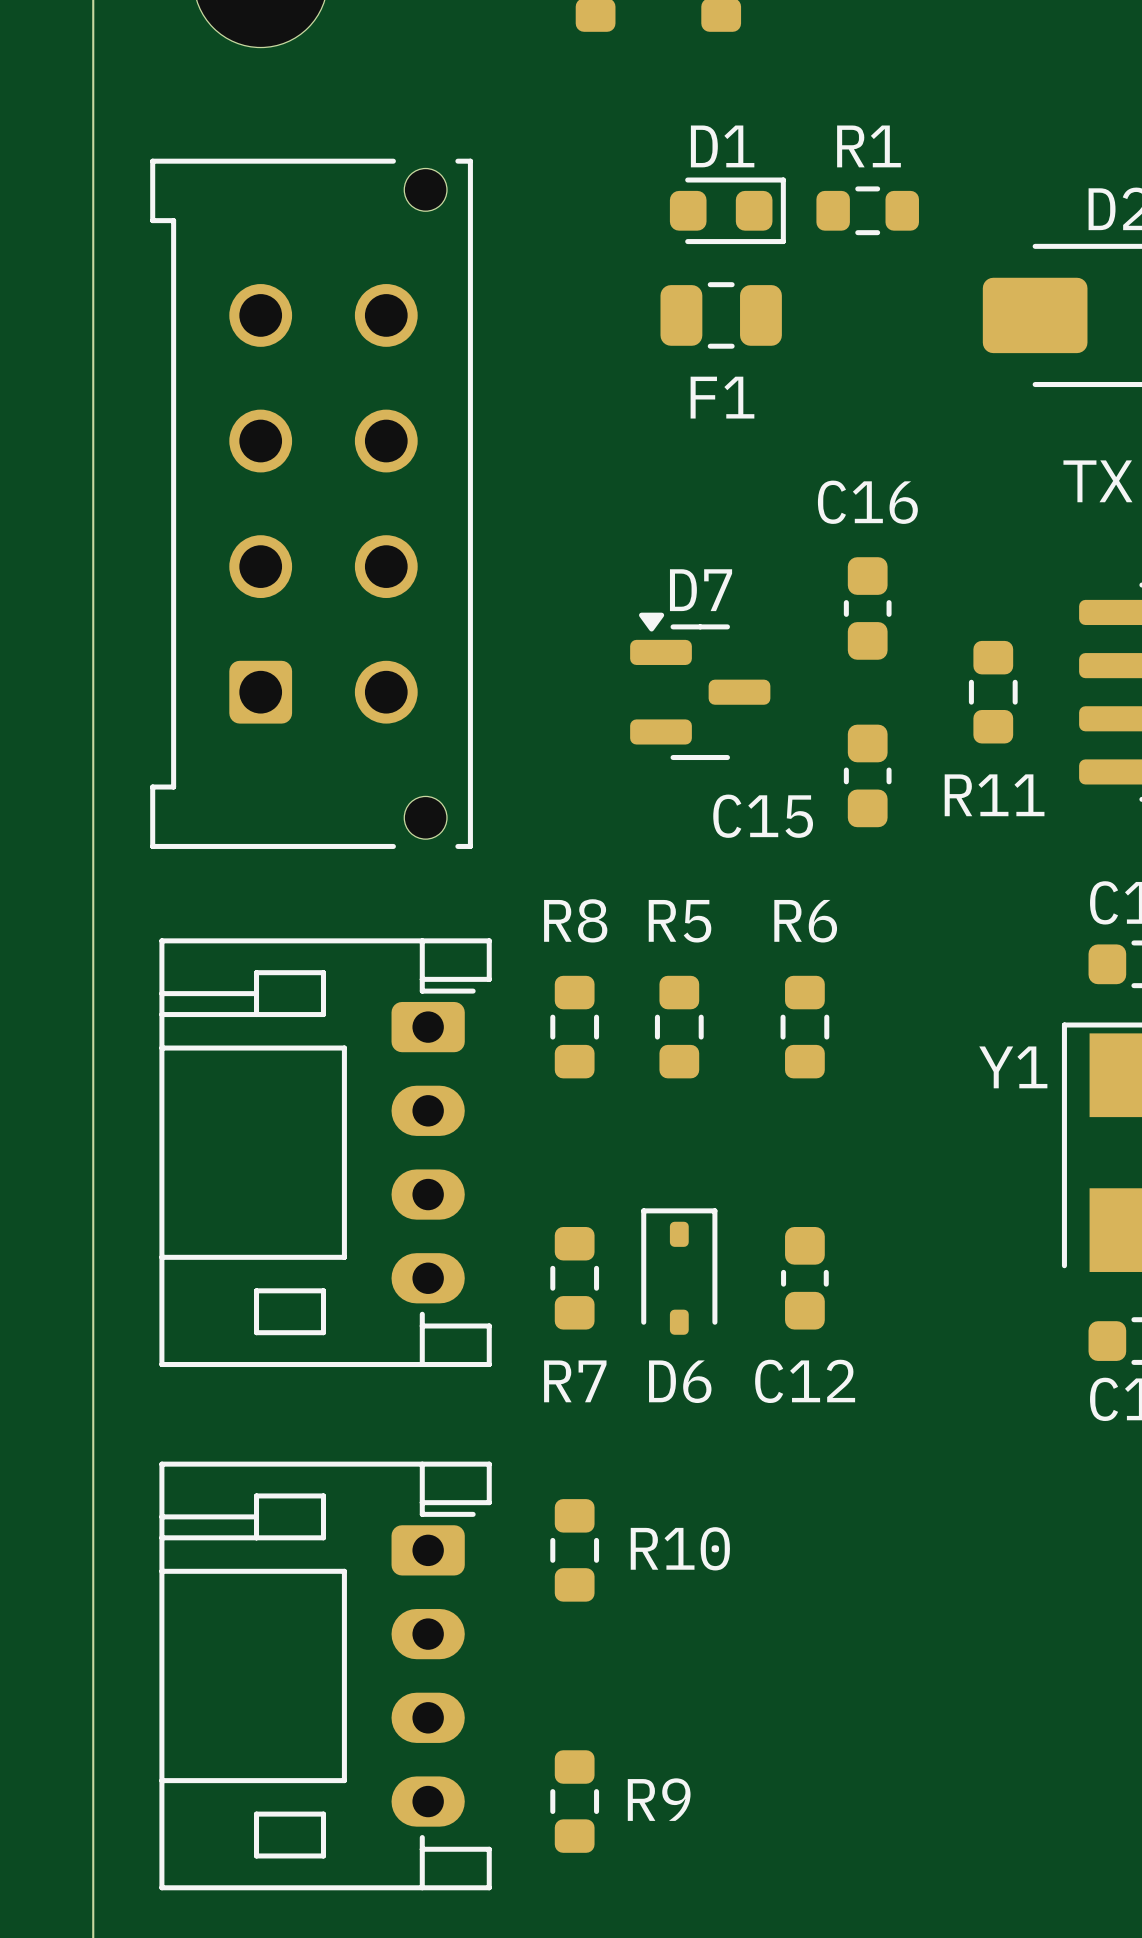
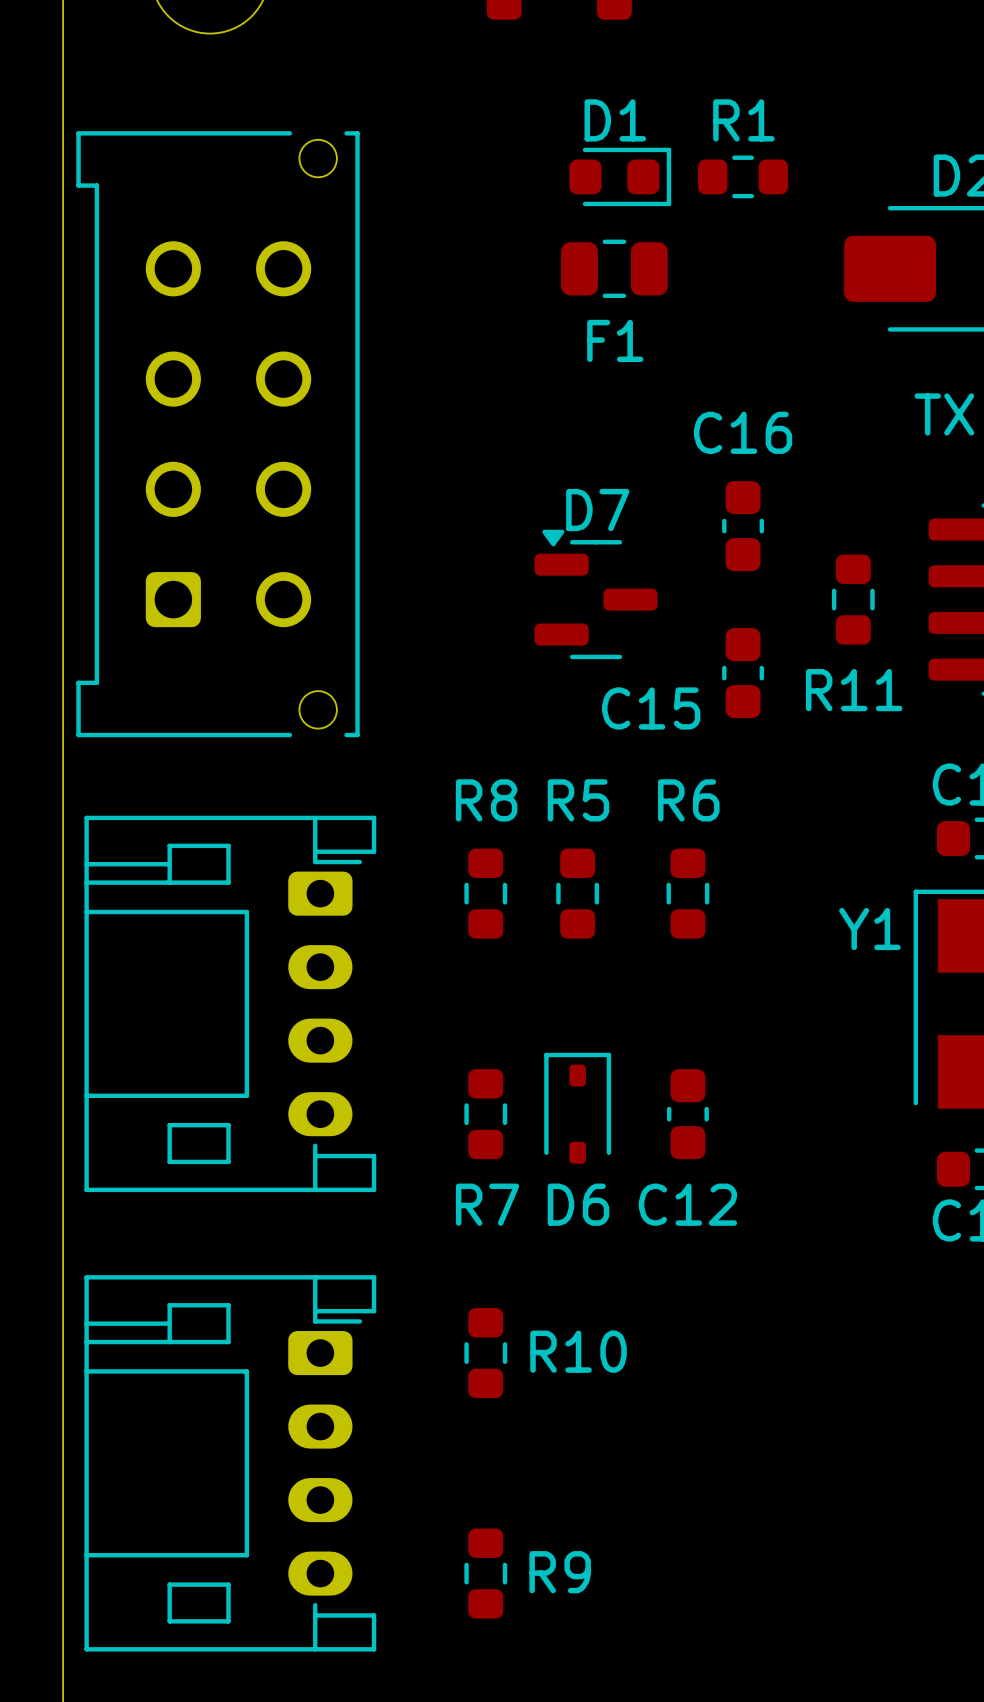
part position: (311, 503) -> (218, 434)
part position: (325, 1152) -> (230, 1003)
part position: (325, 1675) -> (230, 1463)

